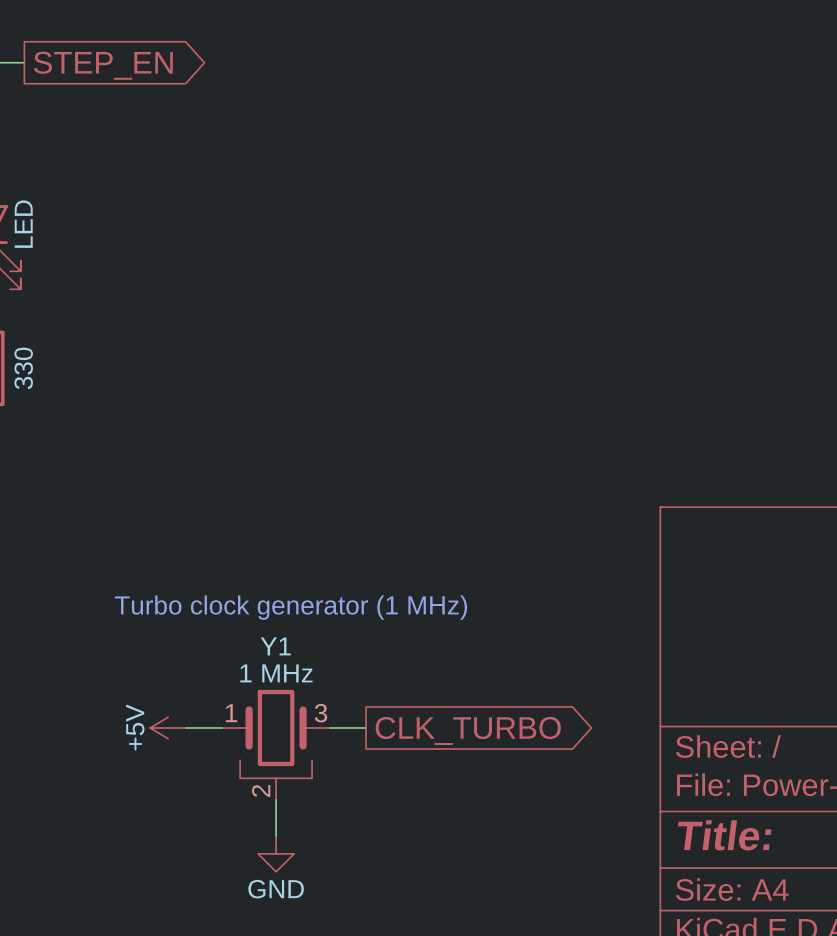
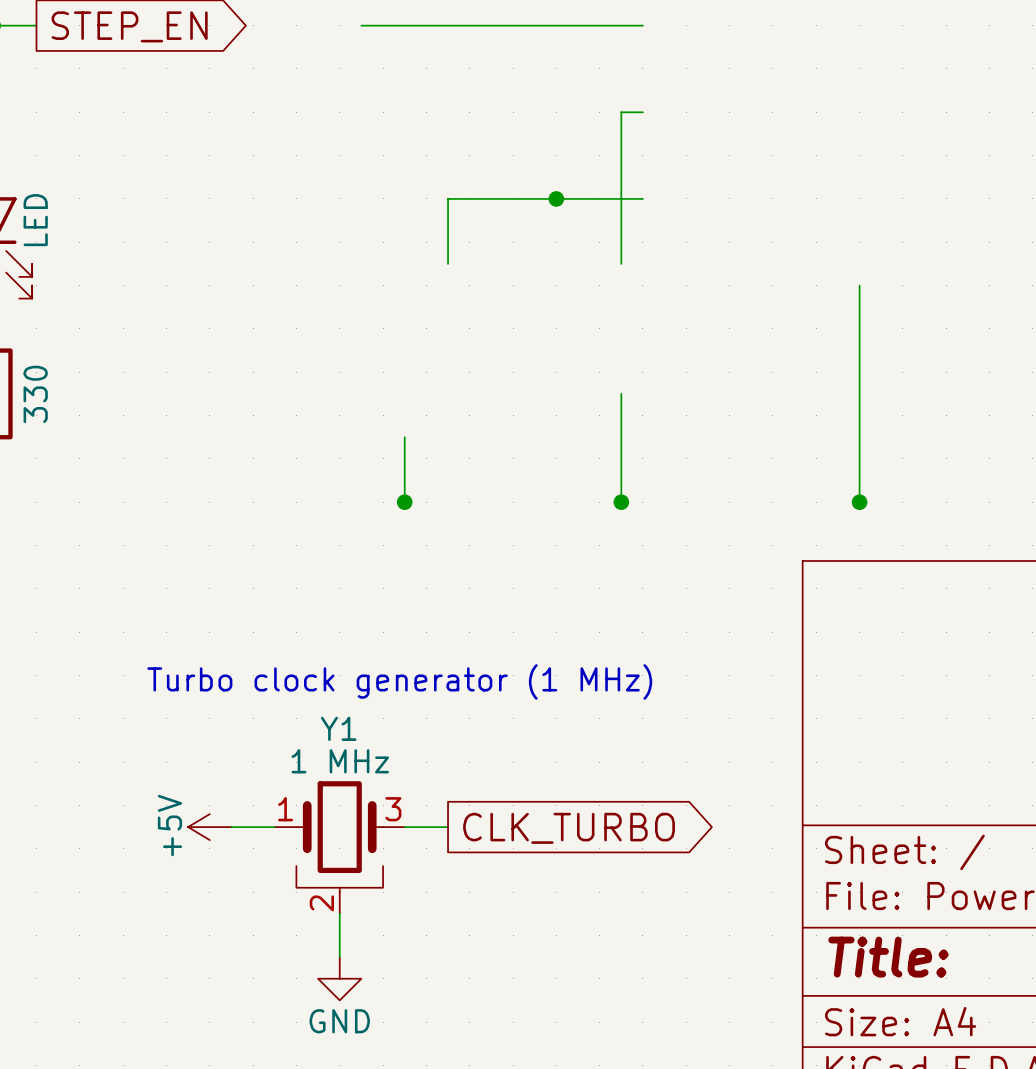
wire: none -> (361, 25) (642, 25)
wire: none -> (642, 112) (621, 112) (621, 263)
junction: none -> (556, 198)
wire: none -> (642, 198) (448, 198) (448, 263)
wire: none -> (859, 285) (859, 502)
wire: none -> (621, 393) (621, 502)
wire: none -> (404, 437) (404, 502)
junction: none -> (404, 502)
junction: none -> (621, 502)
junction: none -> (859, 502)

